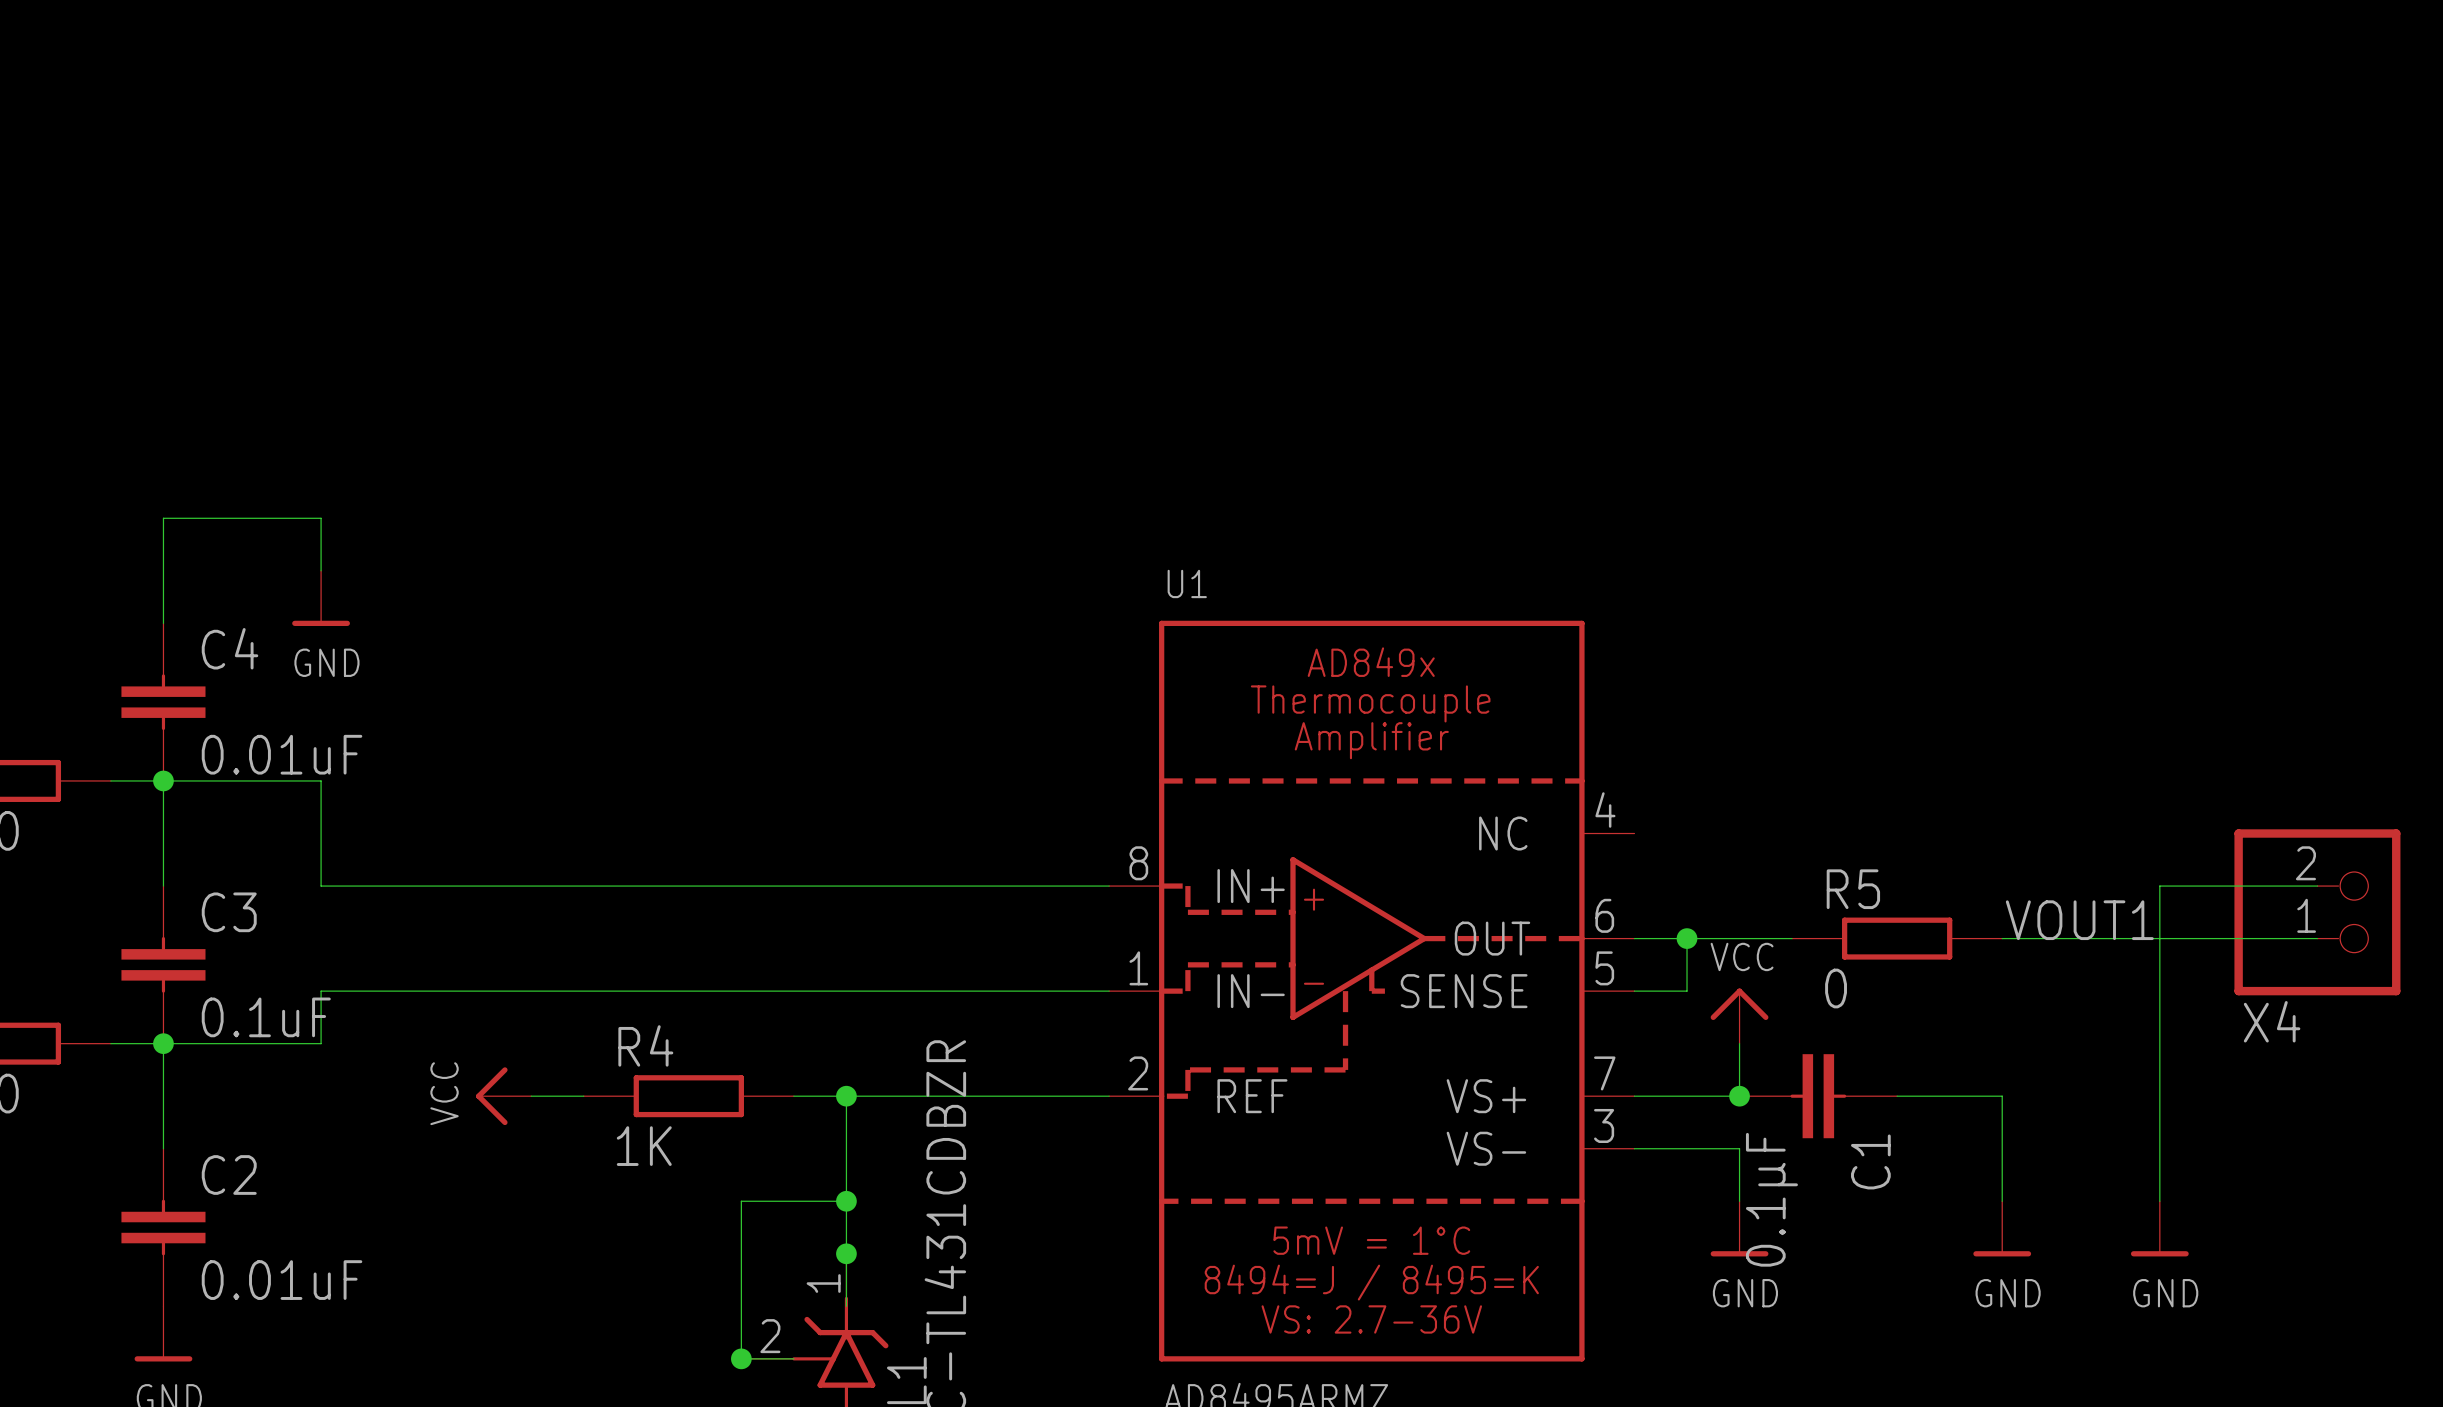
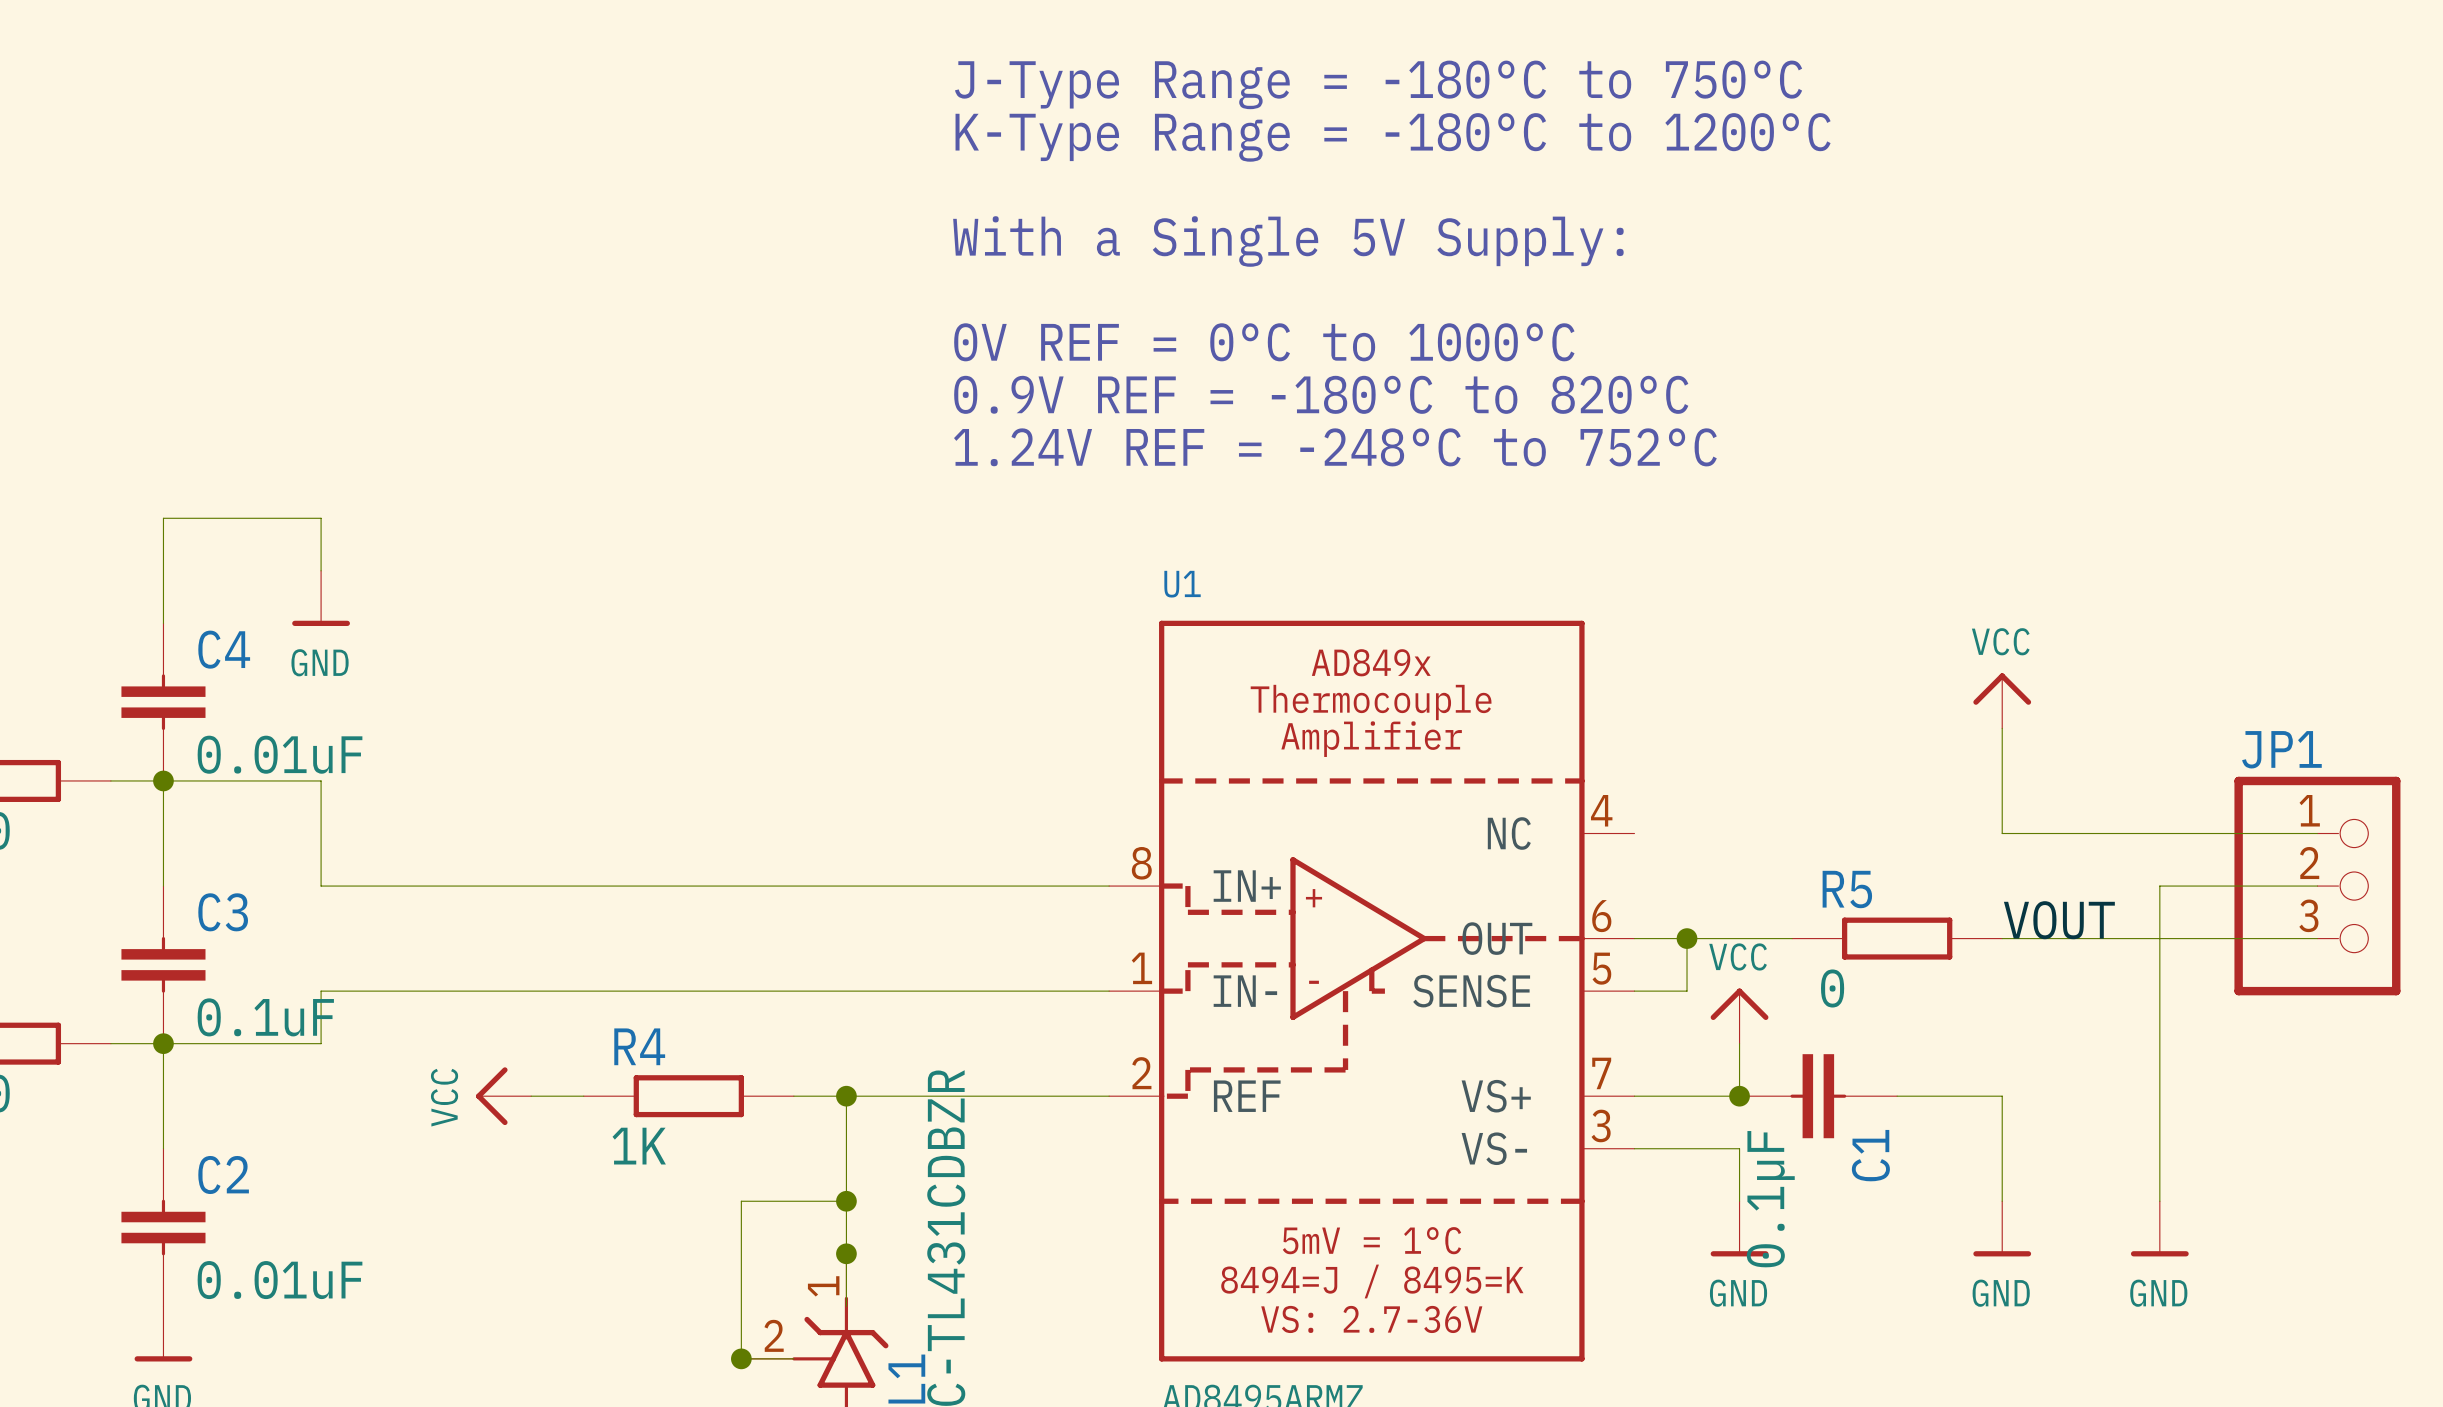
text: none -> J-Type Range = -180°C to 750°C (1378, 84)
text: none -> K-Type Range = -180°C to 1200°C (1393, 137)
text: none -> With a Single 5V Supply: (1288, 241)
text: none -> 0V REF = 0°C to 1000°C (1264, 342)
text: none -> 0.9V REF = -180°C to 820°C (1321, 394)
text: none -> 1.24V REF = -248°C to 752°C (1335, 447)
power symbol: none -> VCC (2002, 700)
wire: none -> (2002, 728) (2002, 833) (2317, 833)
JP1: none -> (2317, 886)
X4: (2317, 912) -> none
label: VOUT1 (2079, 920) -> VOUT (2059, 920)

